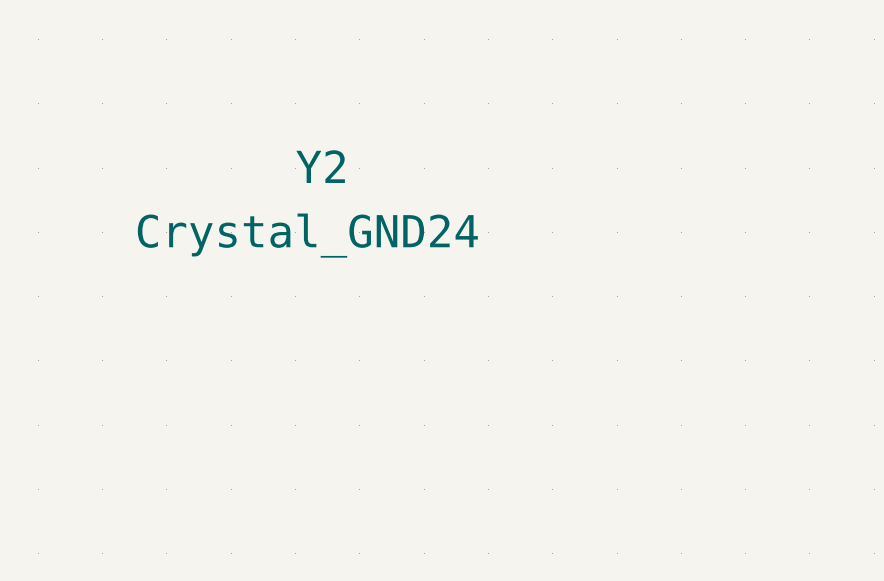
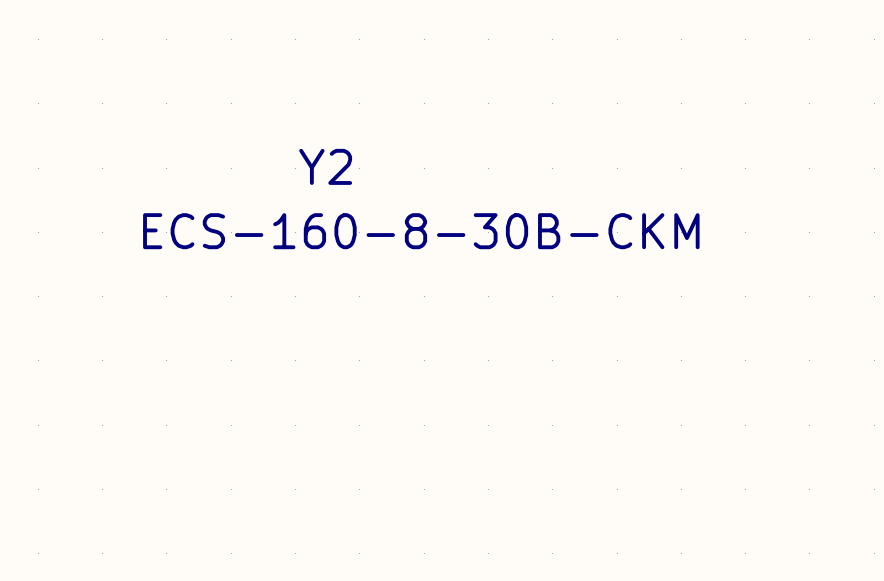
Y2 value: Crystal_GND24 (307, 235) -> ECS-160-8-30B-CKM (421, 231)

